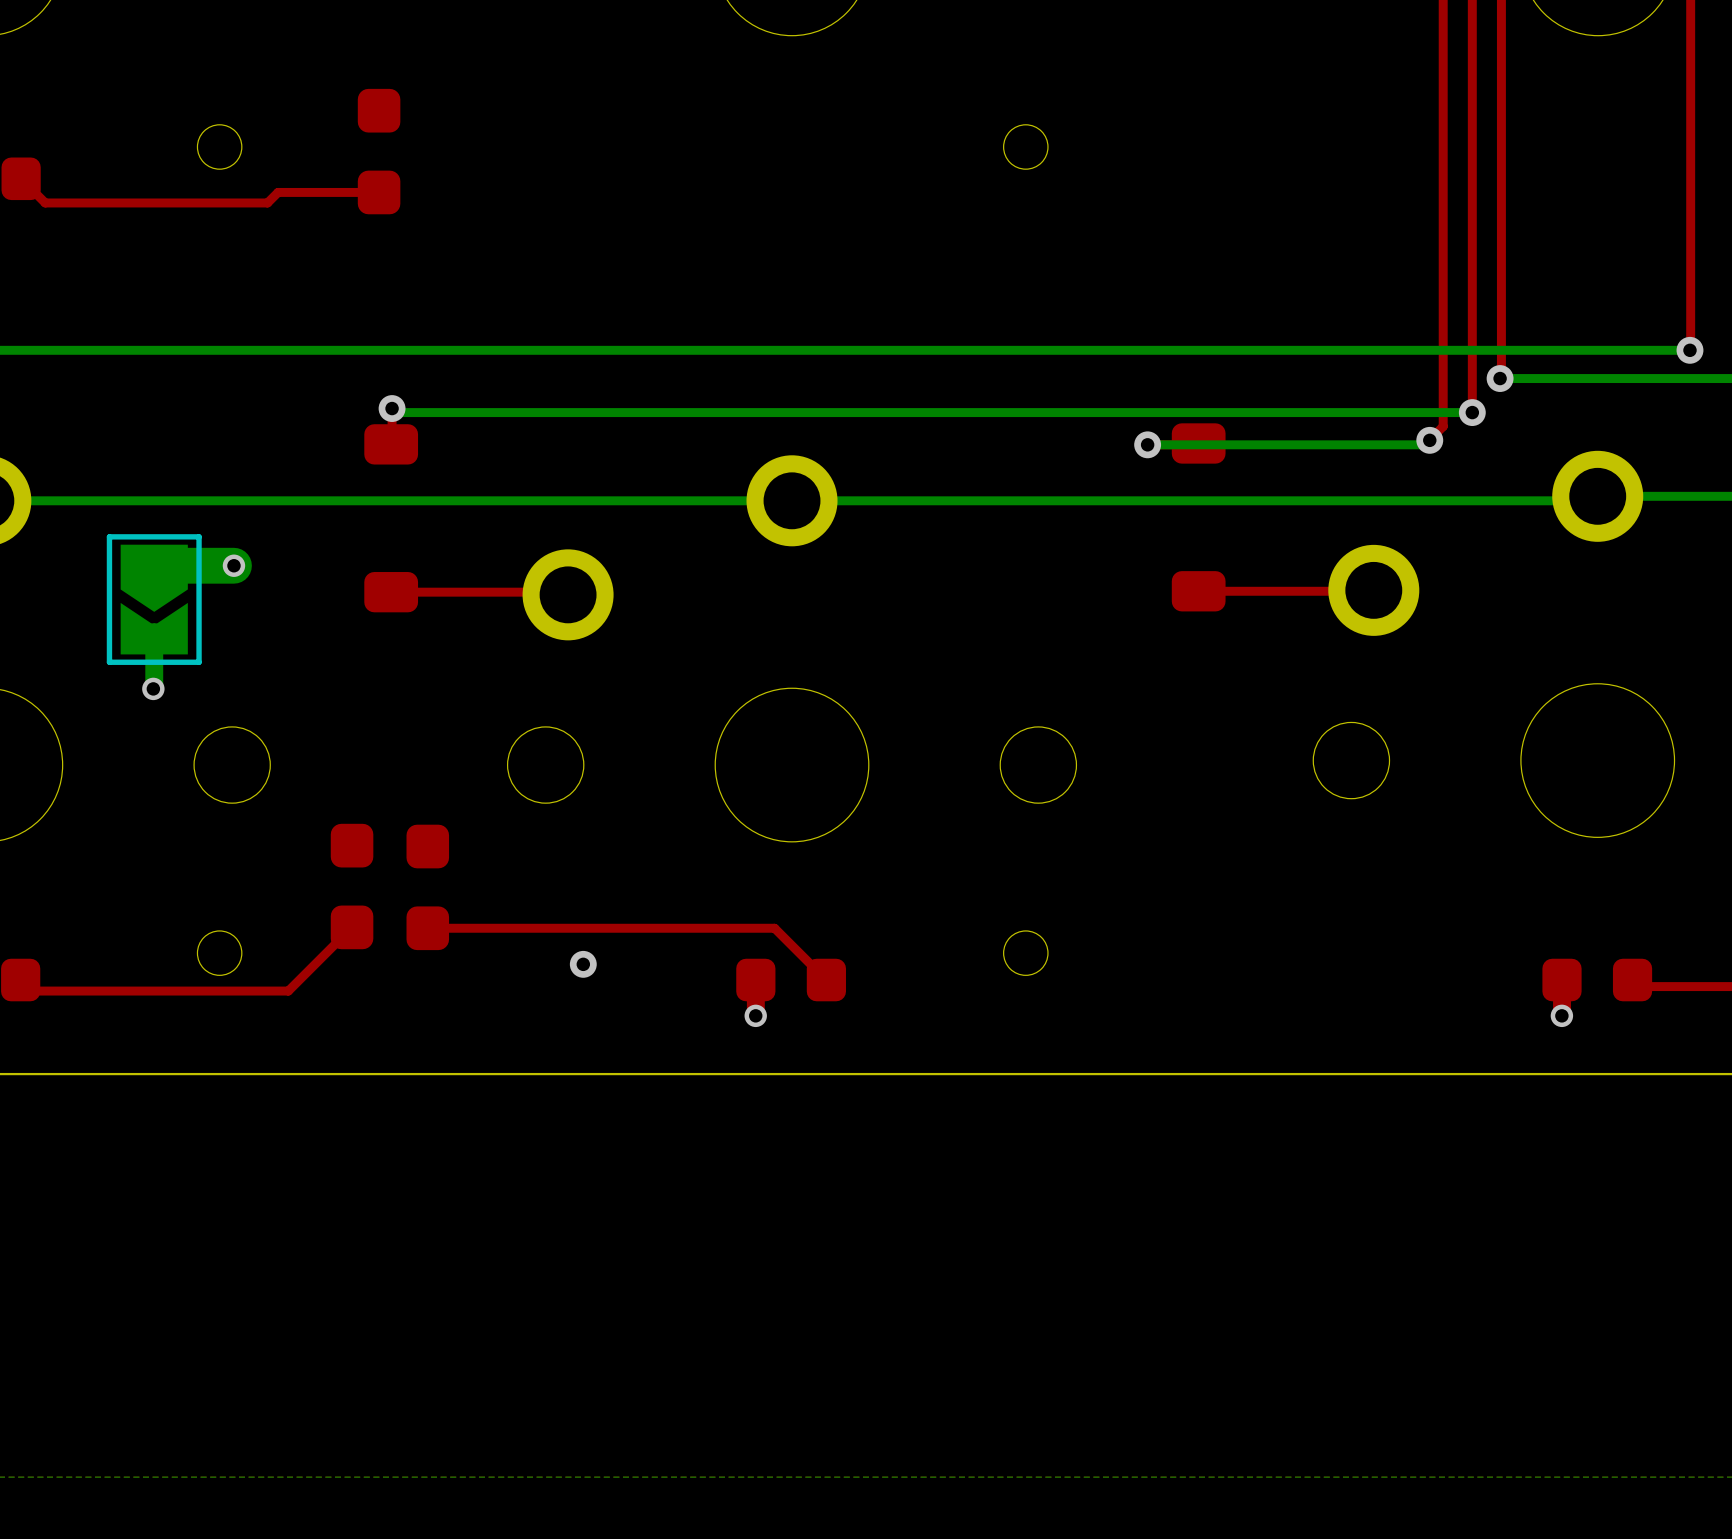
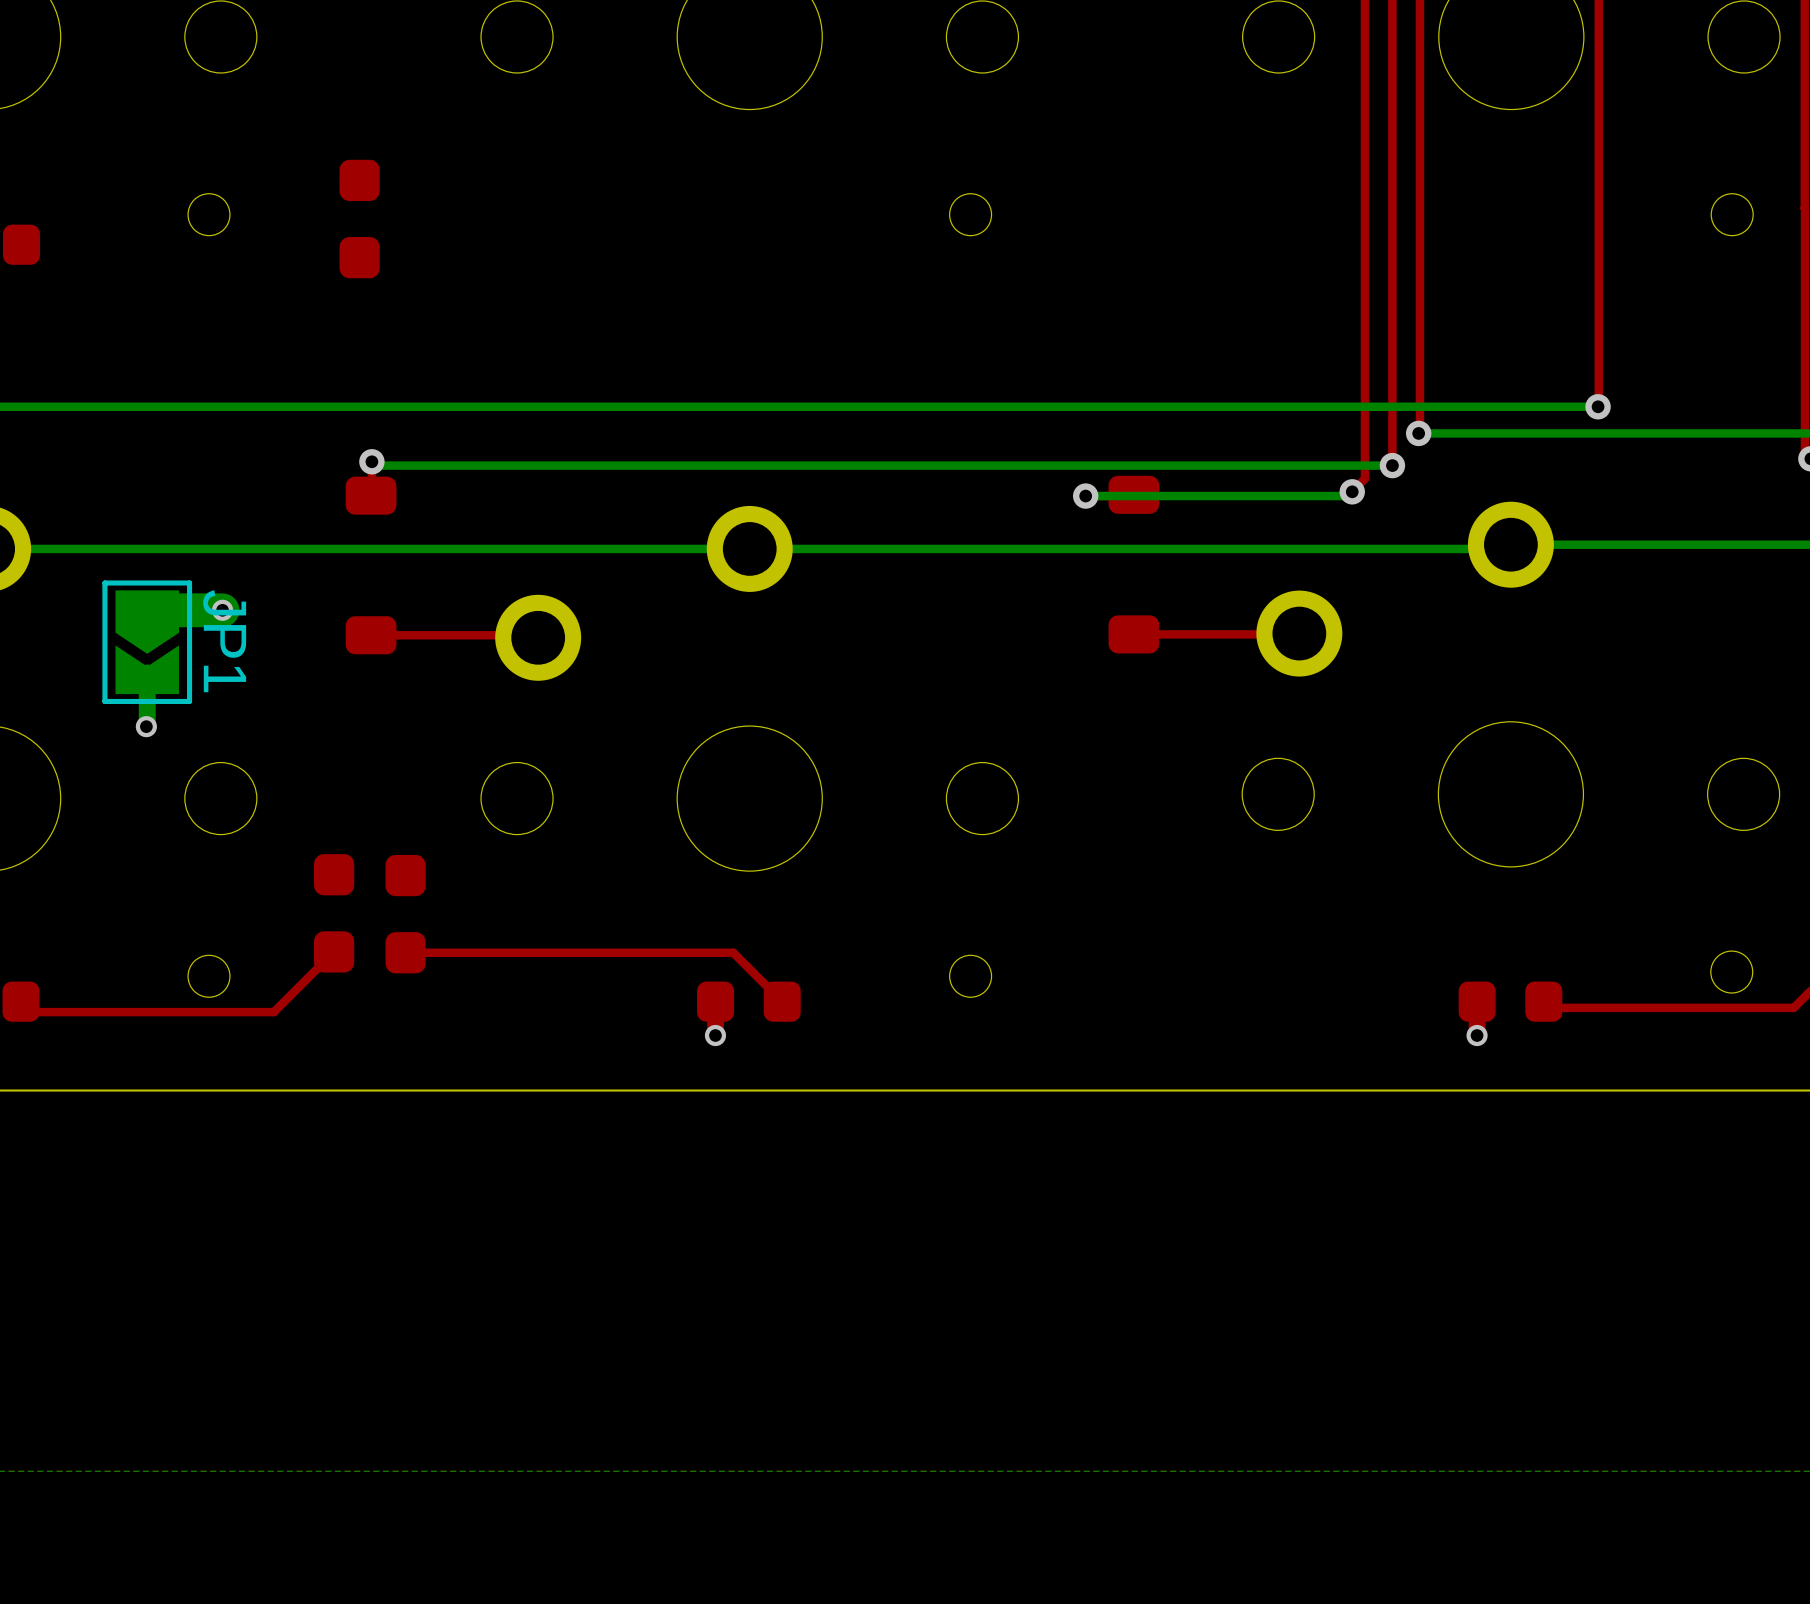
top track: (21, 178) (45, 202) (267, 202) (278, 192) (379, 192) -> none
JP1 name: none -> JP1 (224, 641)
via: (583, 964) -> none

